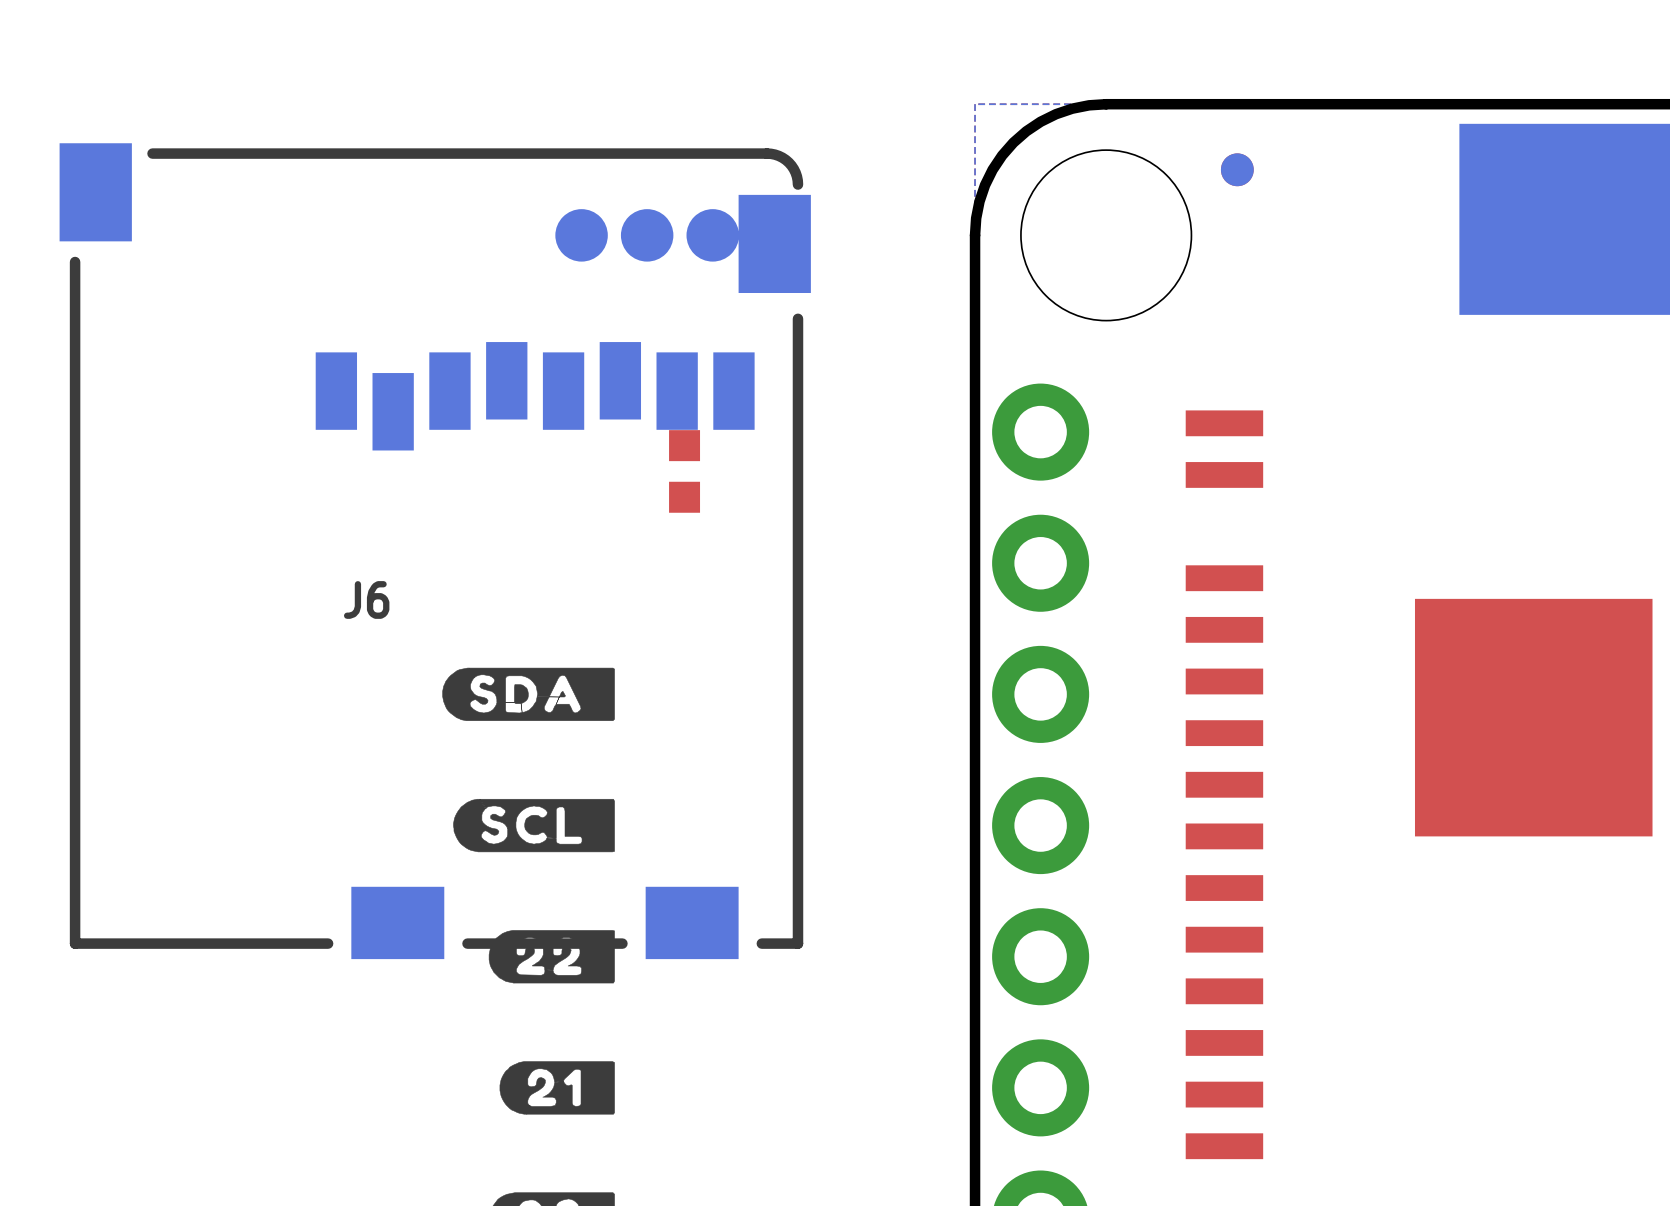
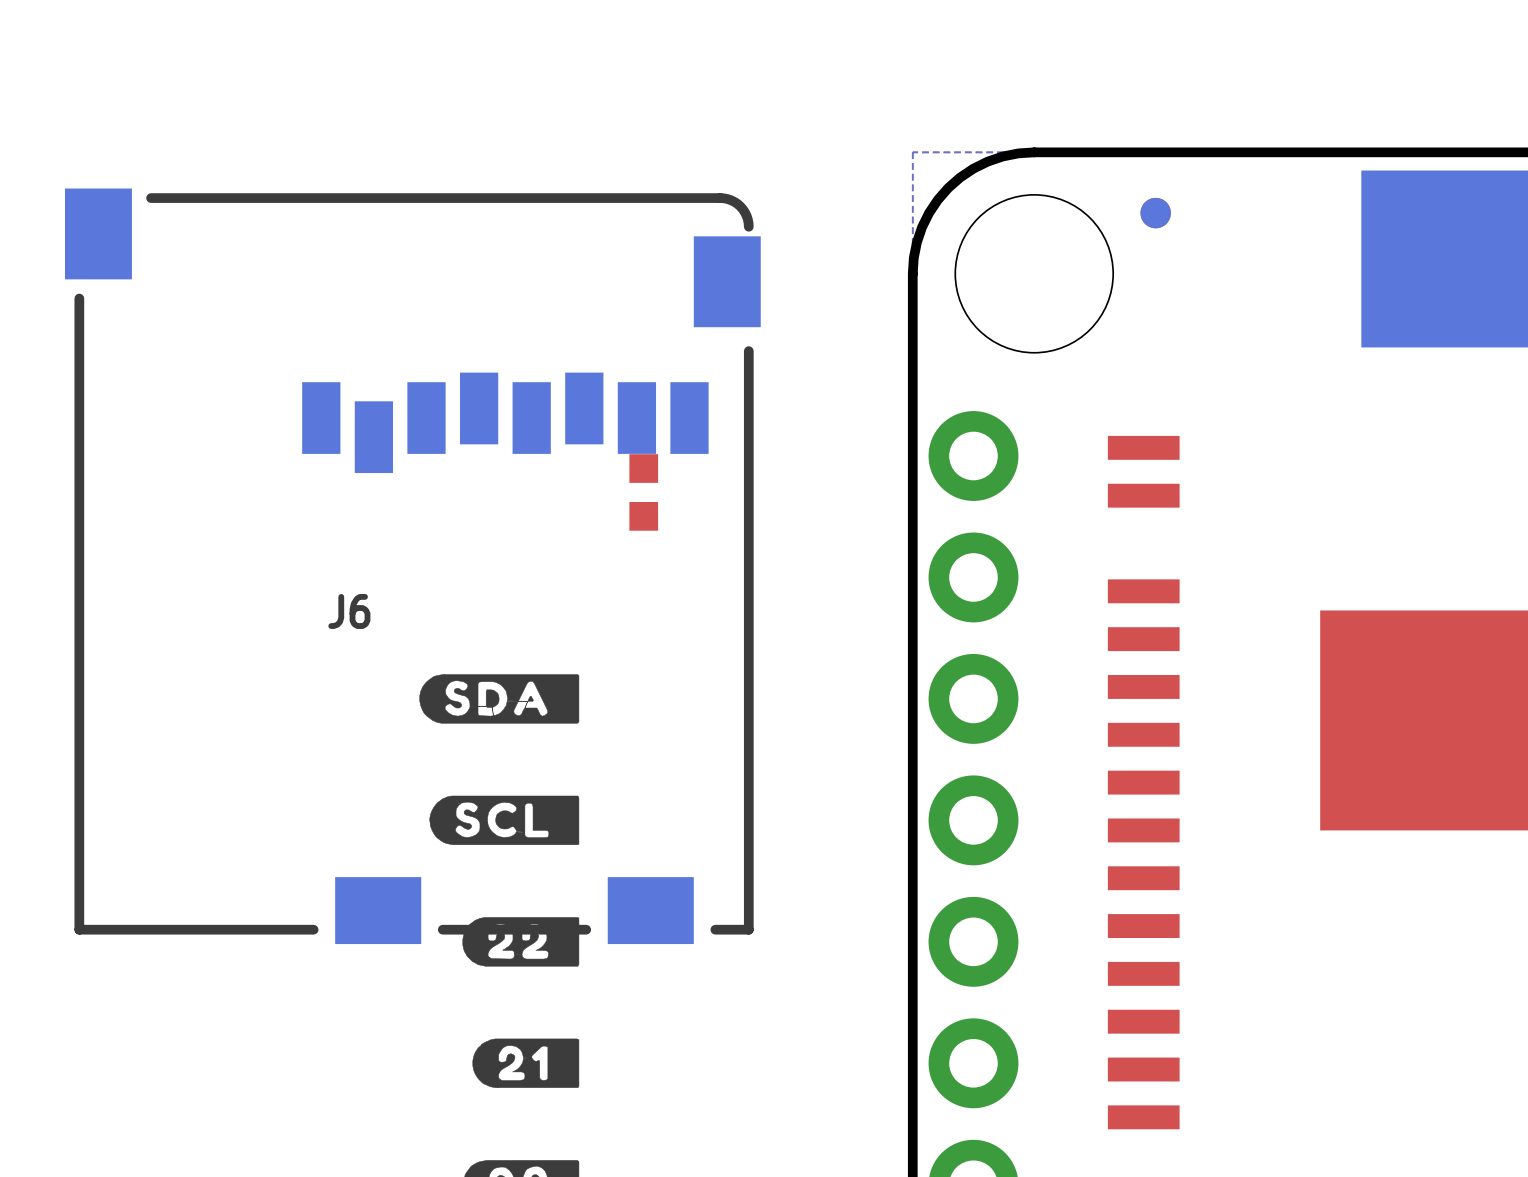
part: (581, 235) -> none
part: (647, 235) -> none
part: (712, 235) -> none

